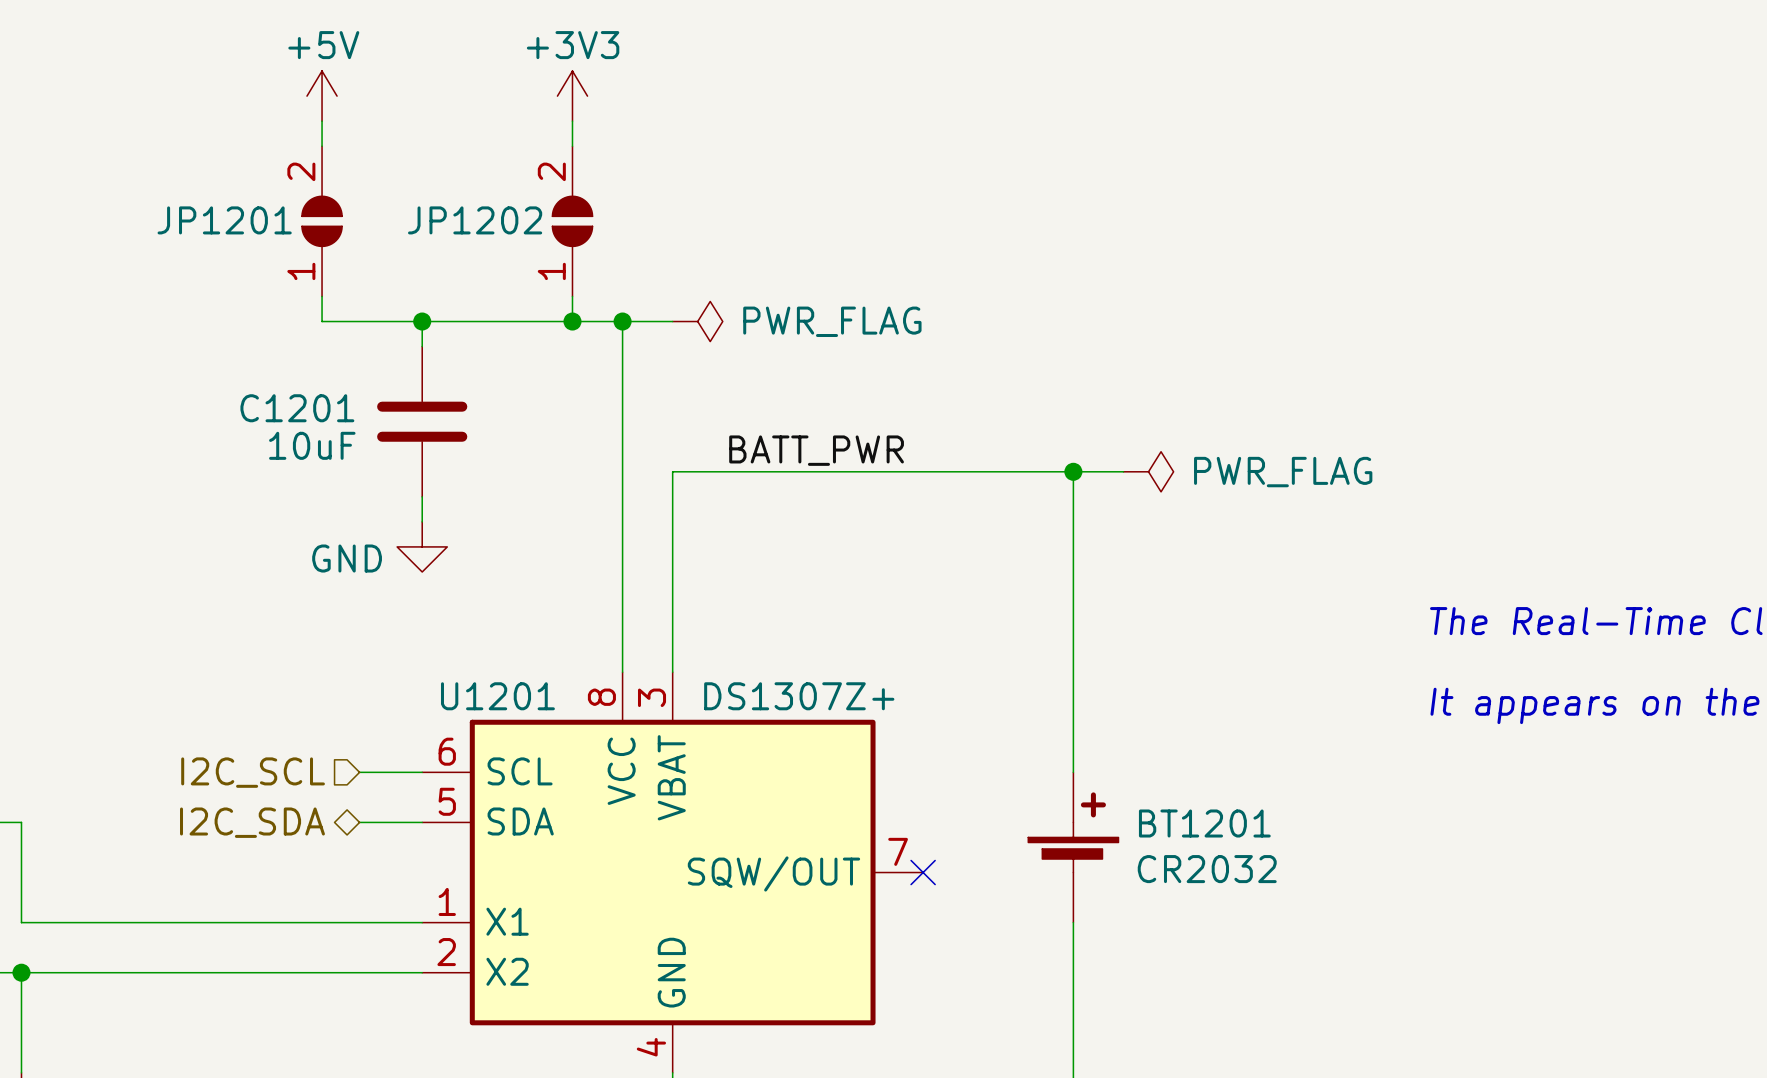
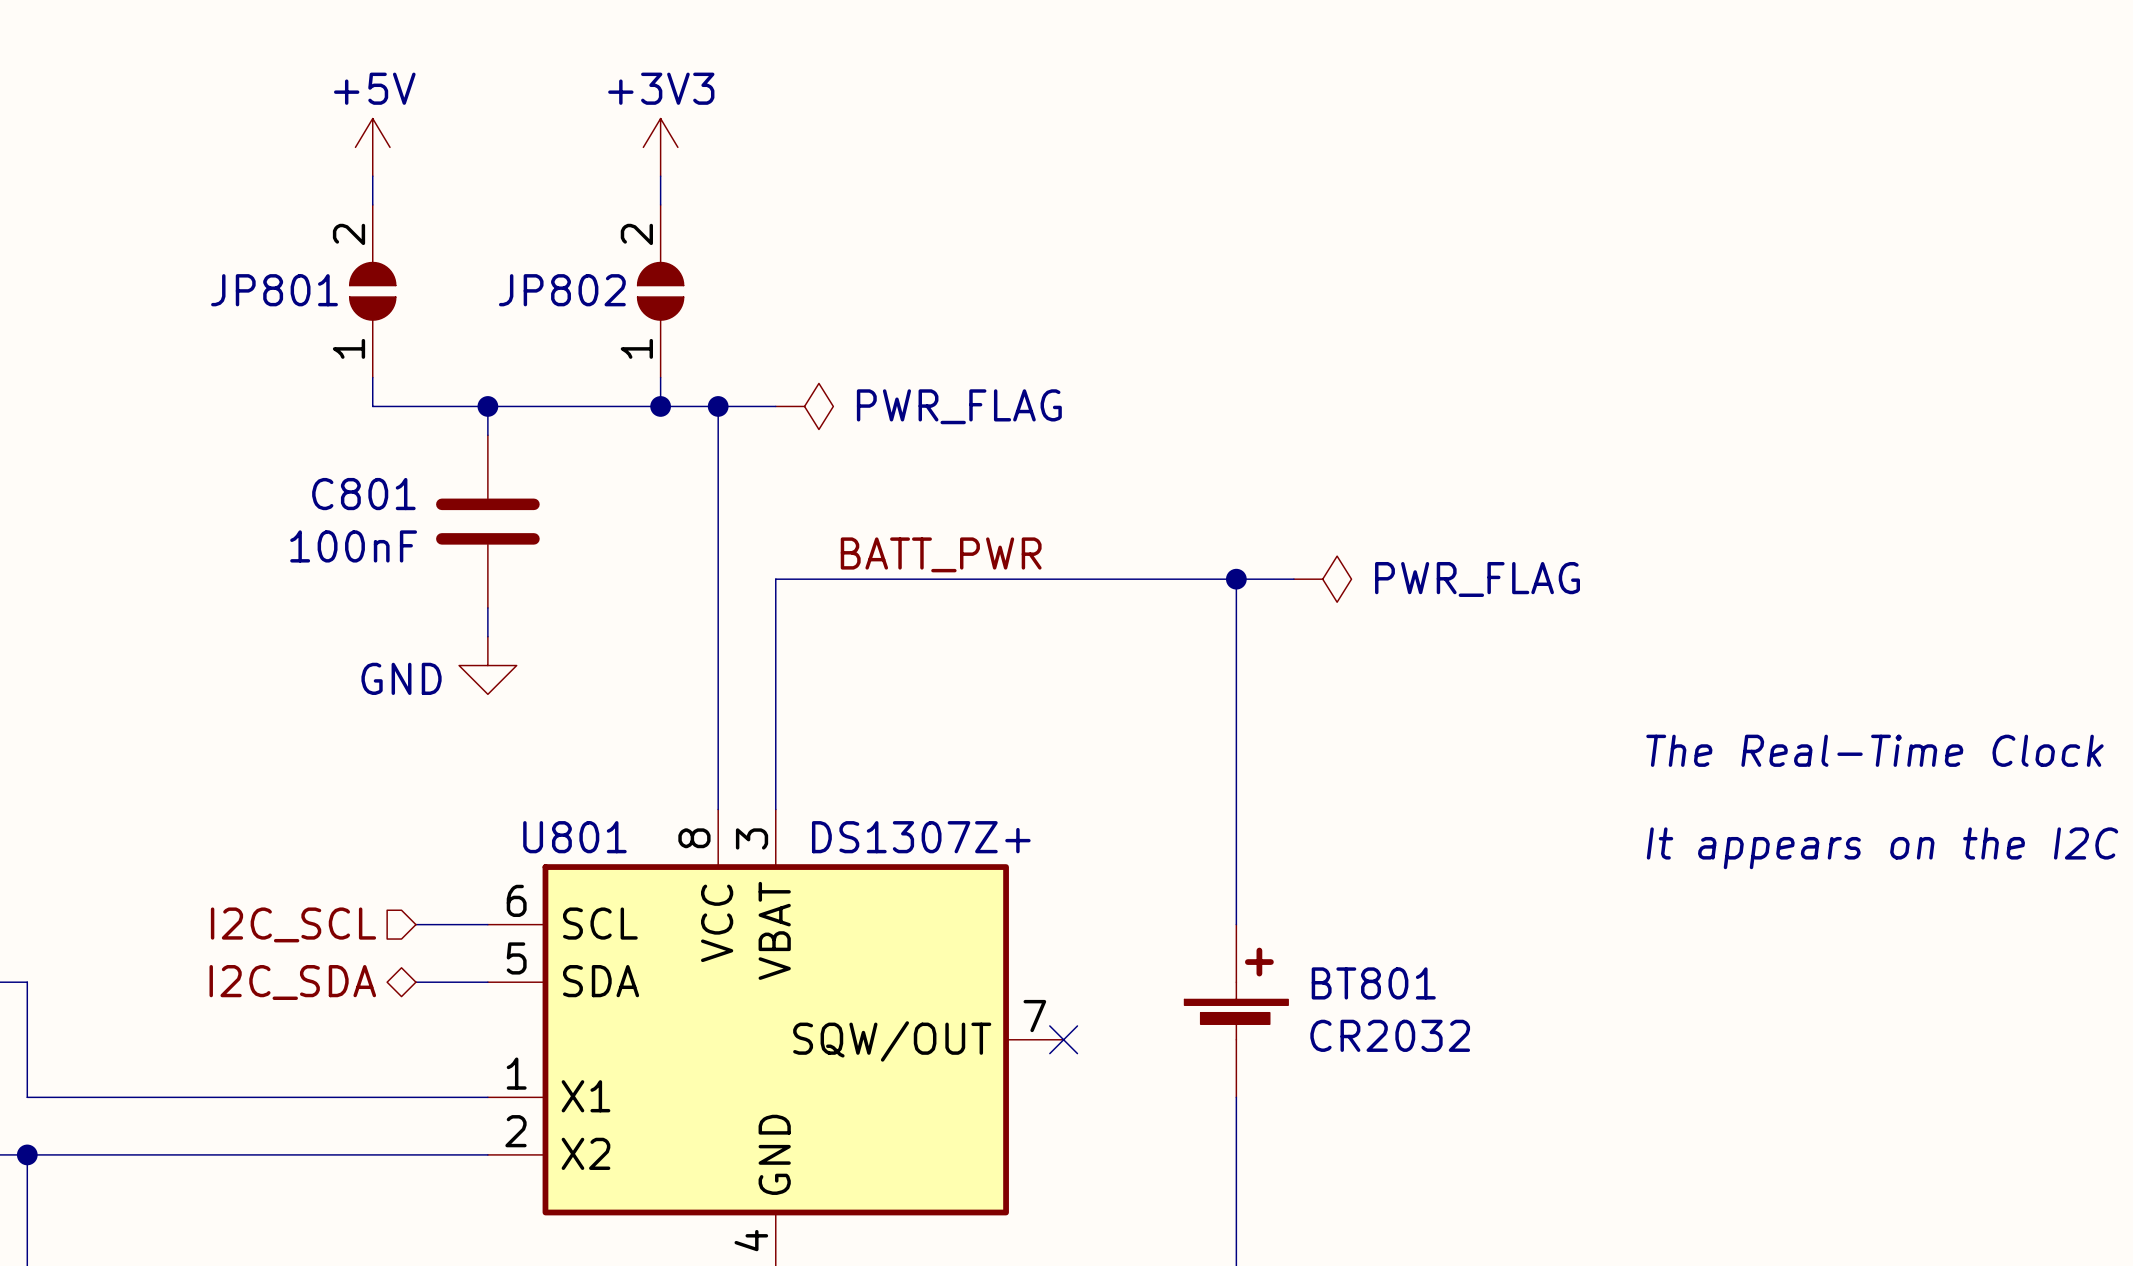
JP1201 name: JP1201 (224, 220) -> JP801 (274, 290)
JP1202 name: JP1202 (475, 220) -> JP802 (562, 290)
C1201 name: C1201 (297, 408) -> C801 (363, 494)
C1201 value: 10uF (312, 445) -> 100nF (353, 546)
U1201 name: U1201 (497, 696) -> U801 (574, 837)
BT1201 name: BT1201 (1204, 823) -> BT801 (1373, 983)

